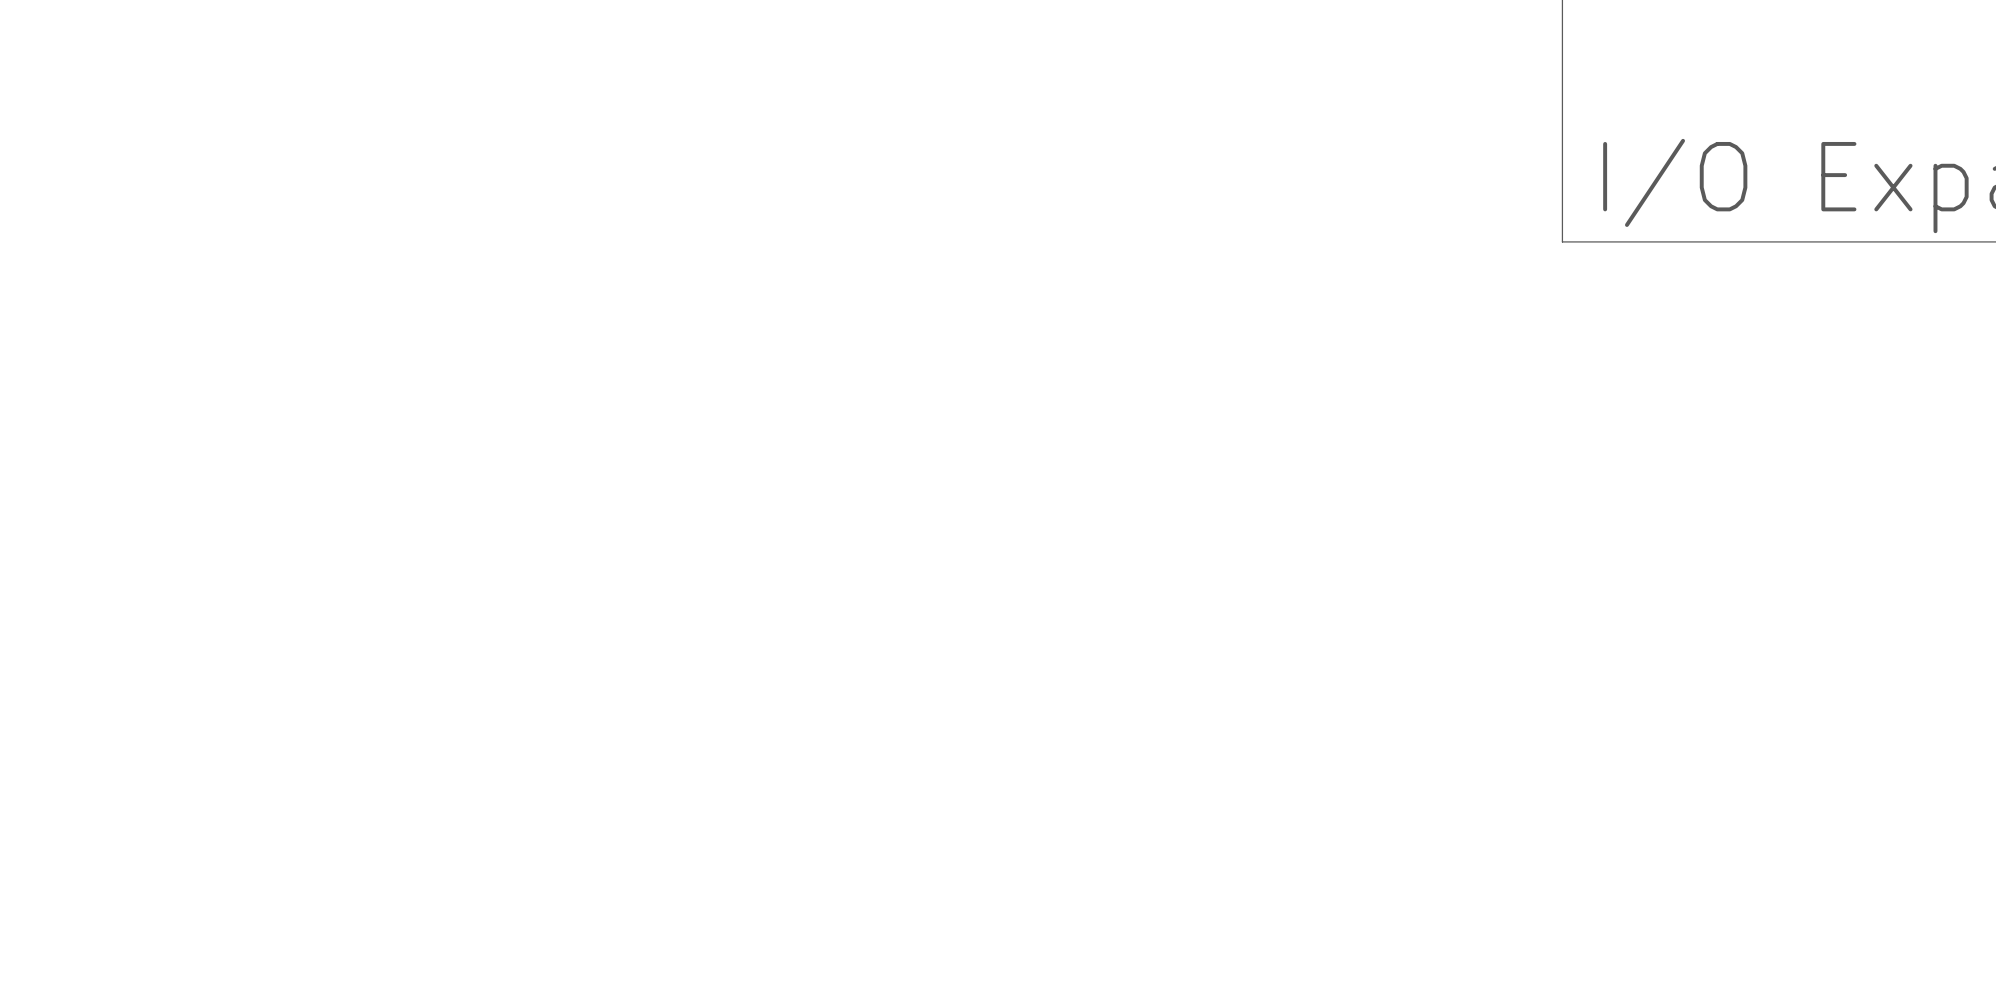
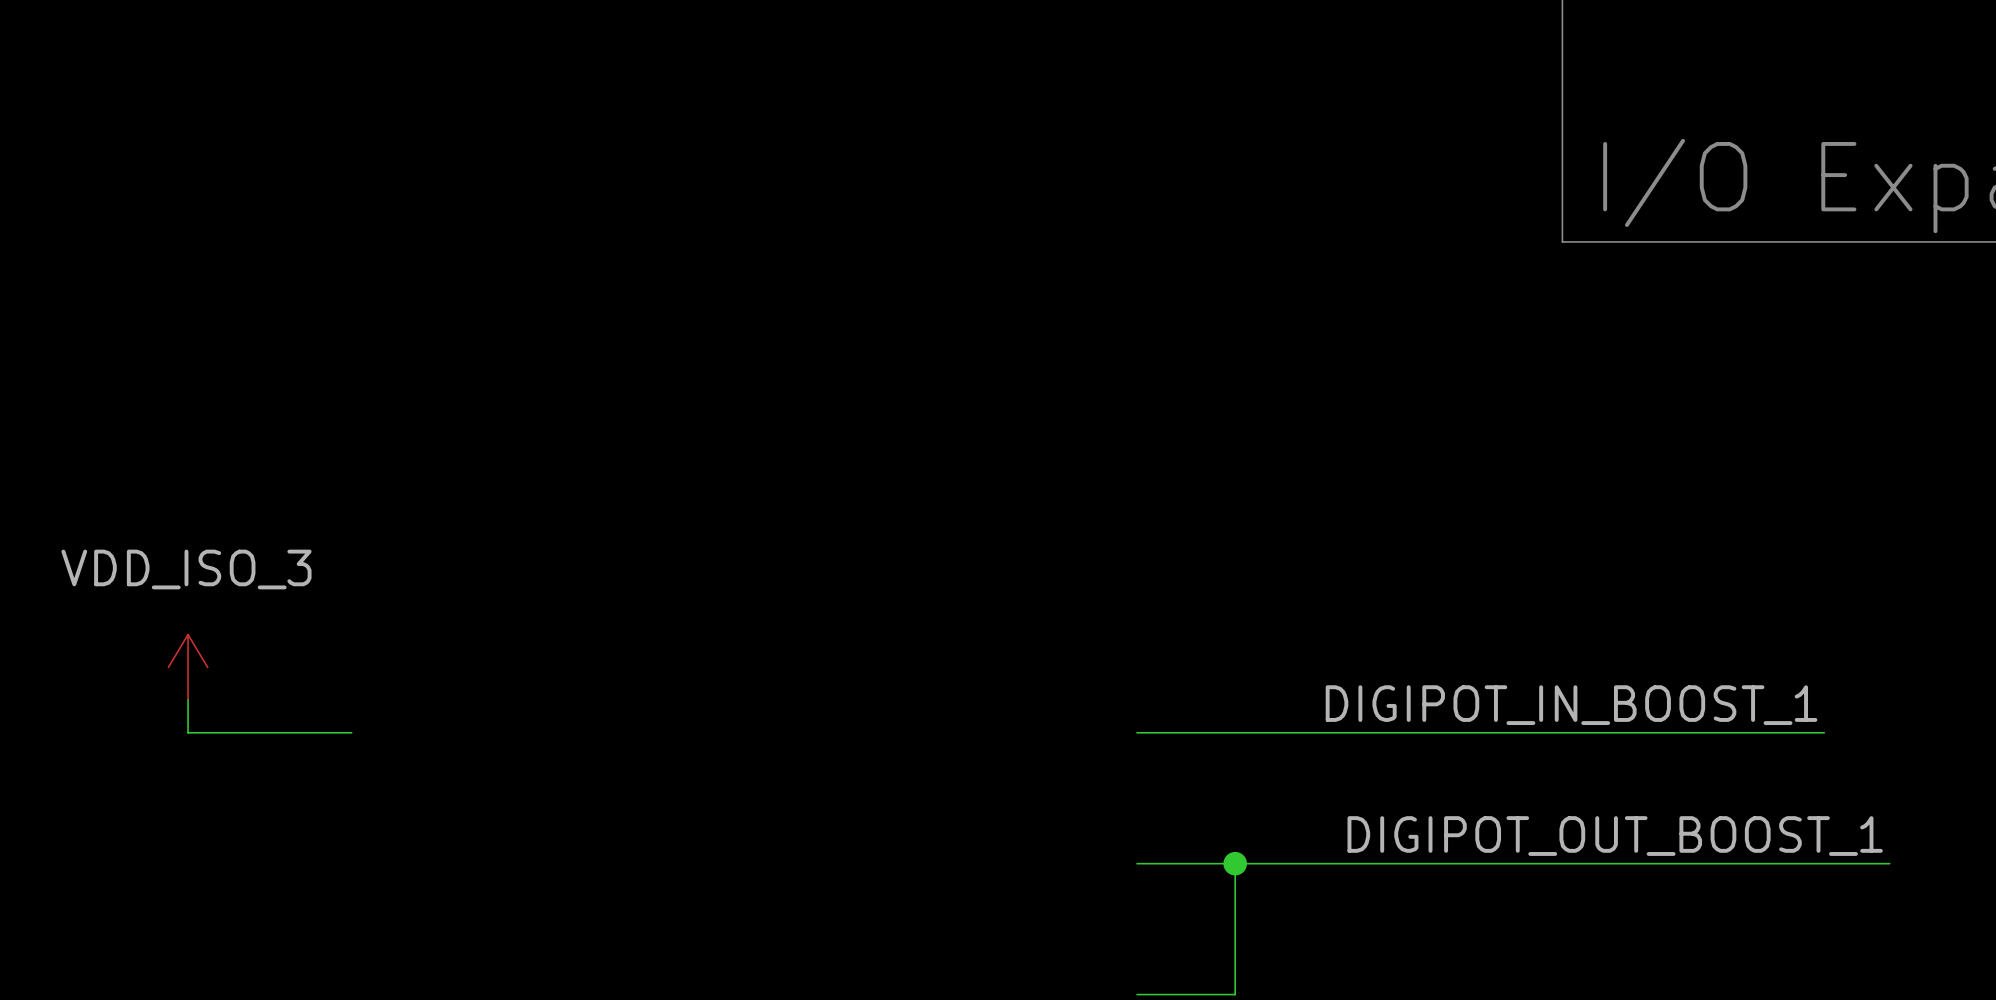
power symbol: none -> VDD_ISO_3 (188, 667)
wire: none -> (188, 700) (188, 732) (351, 732)
label: none -> DIGIPOT_IN_BOOST_1 (1571, 705)
wire: none -> (1137, 732) (1824, 732)
label: none -> DIGIPOT_OUT_BOOST_1 (1615, 836)
wire: none -> (1137, 863) (1889, 863)
wire: none -> (1235, 863) (1235, 994) (1137, 994)
junction: none -> (1235, 863)

